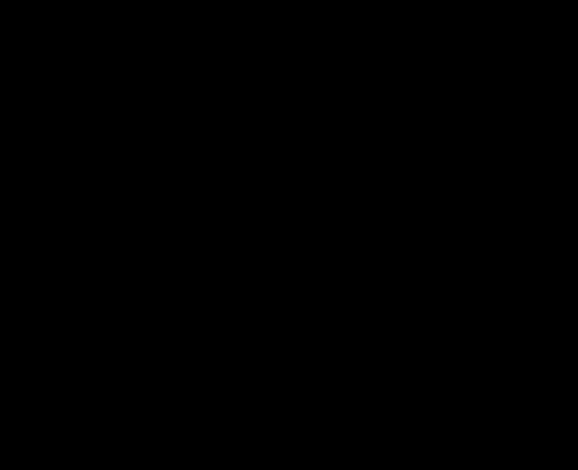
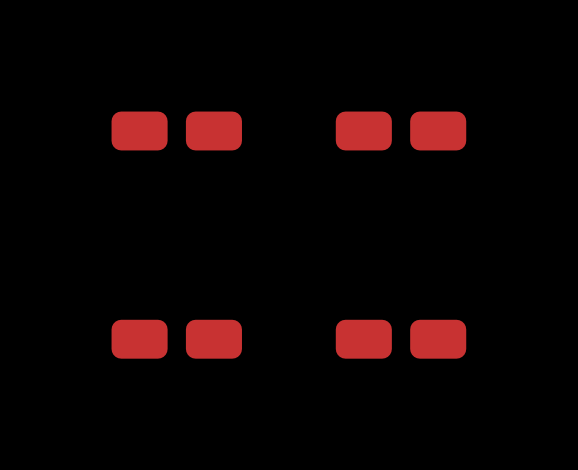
part: none -> (176, 130)
part: none -> (401, 130)
part: none -> (176, 339)
part: none -> (401, 339)

